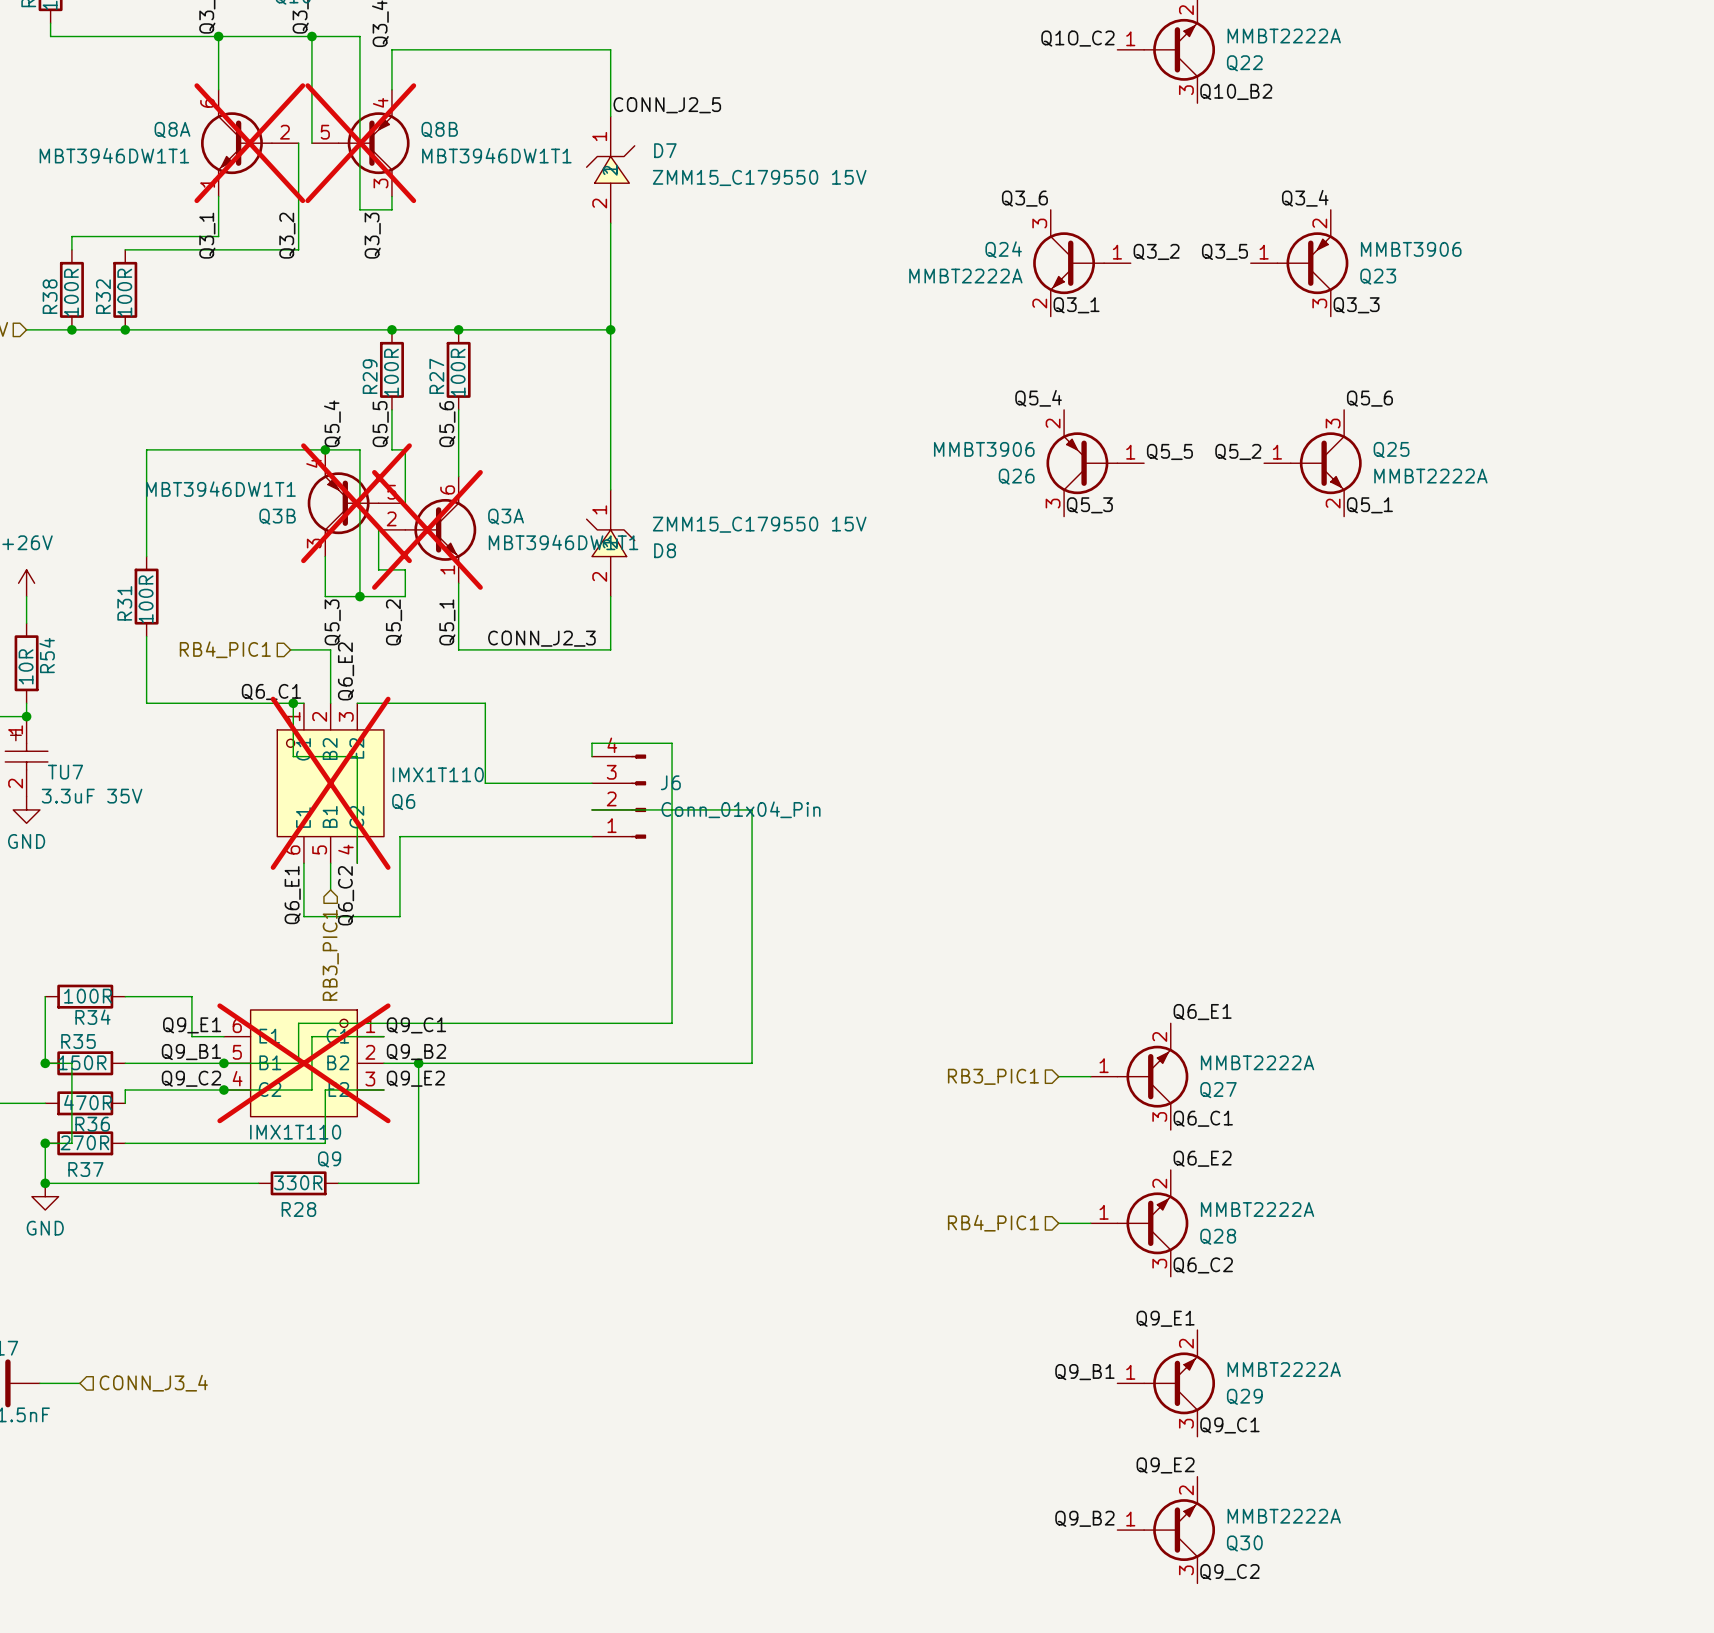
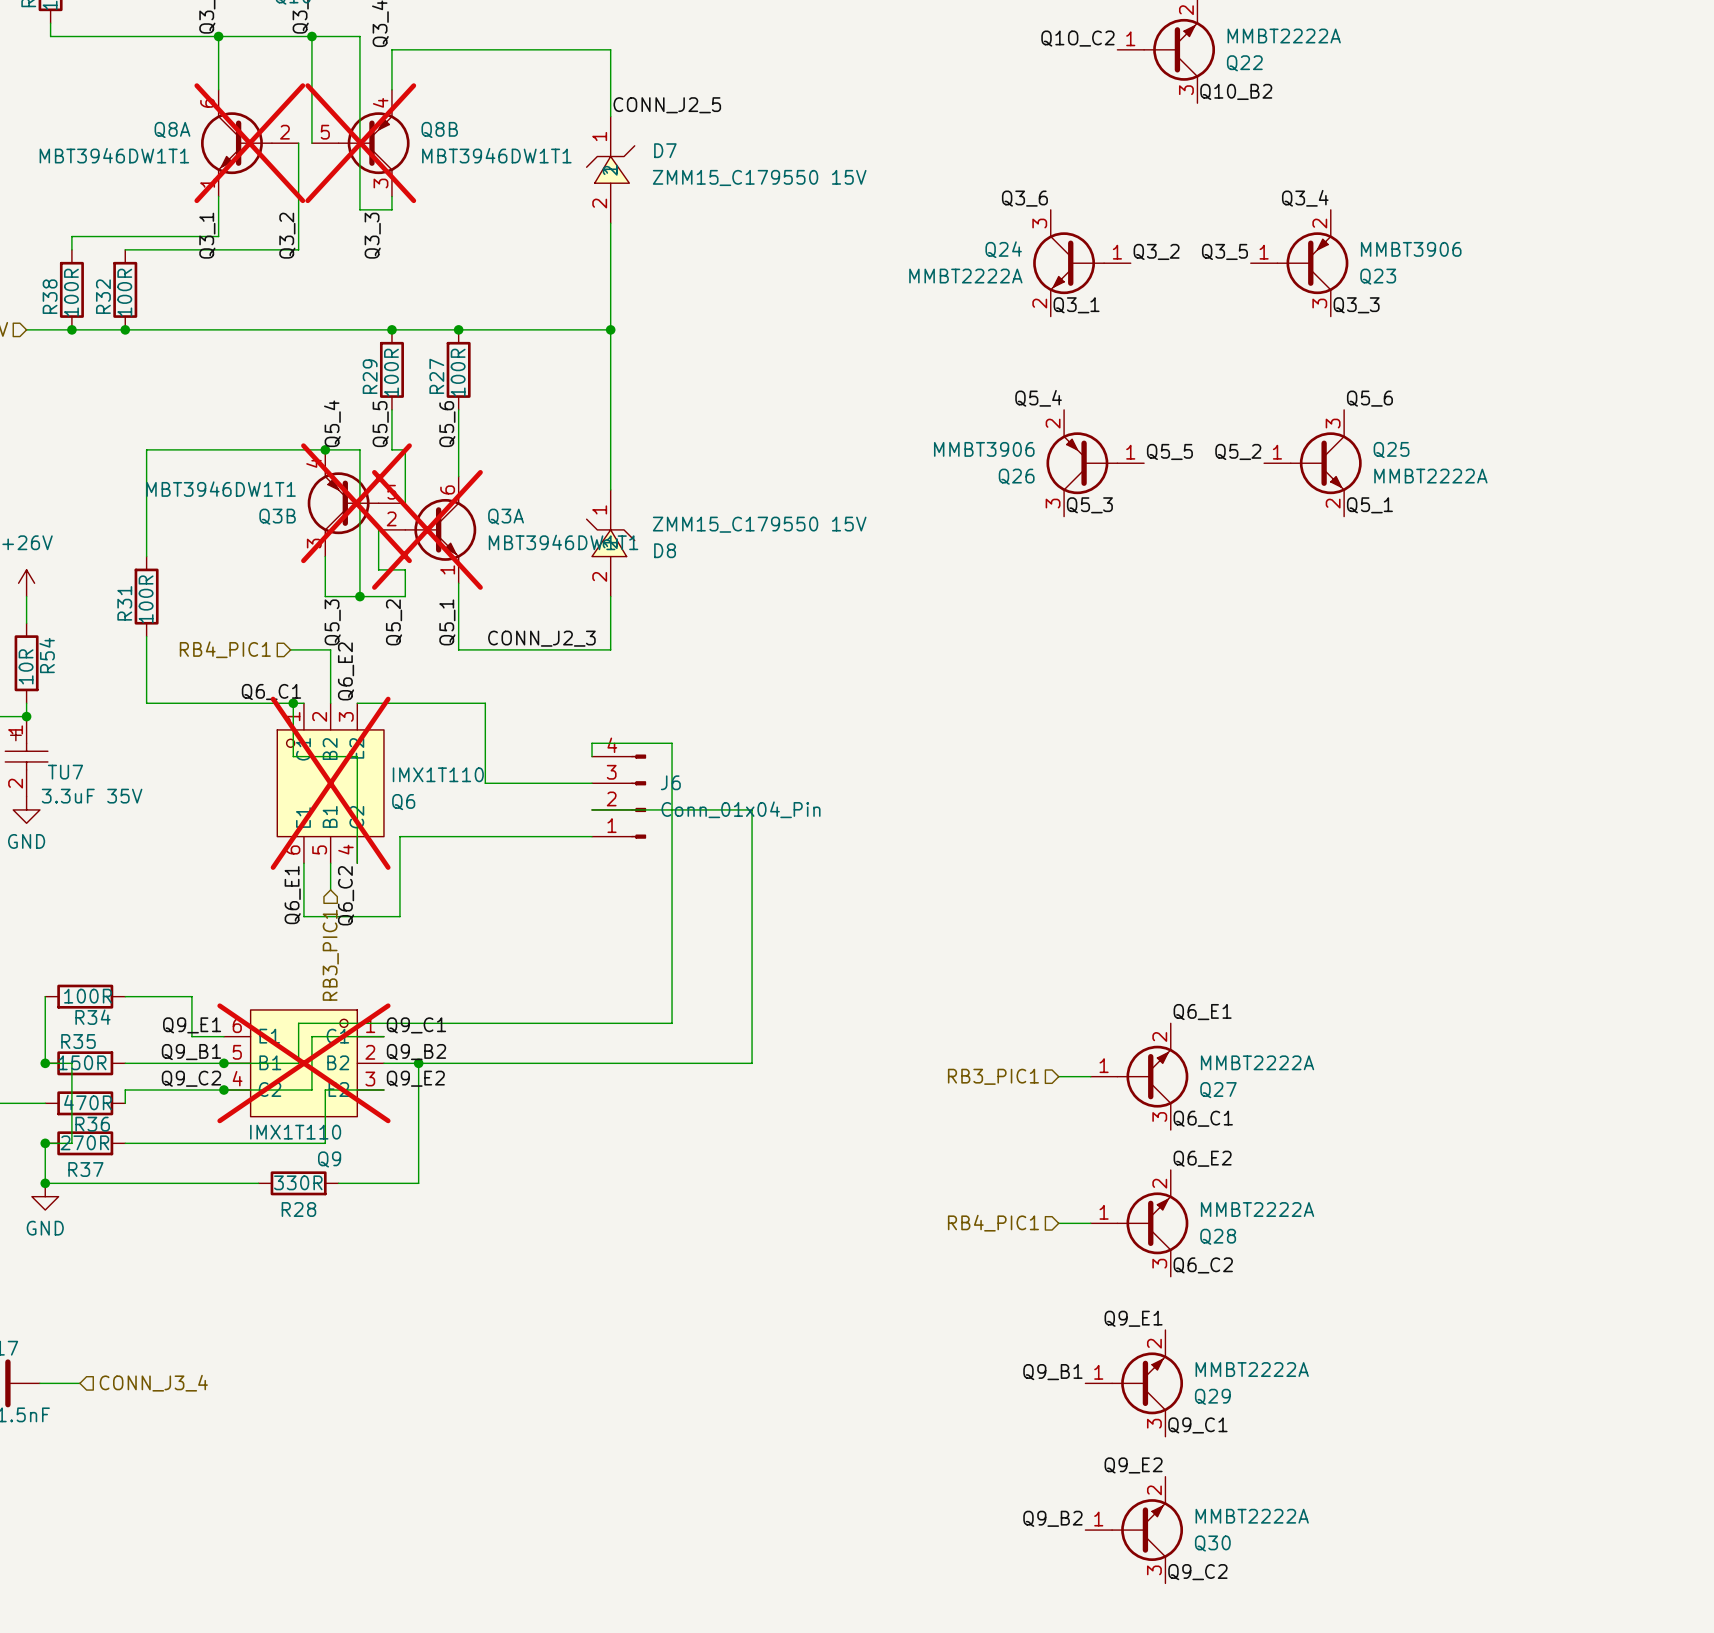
label position: Q9_E1 (1165, 1318) -> Q9_E1 (1133, 1318)
label position: Q9_B1 (1084, 1372) -> Q9_B1 (1052, 1372)
Q29 position: (1166, 1383) -> (1134, 1383)
label position: Q9_C1 (1229, 1425) -> Q9_C1 (1197, 1425)
label position: Q9_E2 (1165, 1465) -> Q9_E2 (1133, 1465)
label position: Q9_B2 (1084, 1518) -> Q9_B2 (1052, 1518)
Q30 position: (1166, 1530) -> (1134, 1530)
label position: Q9_C2 (1229, 1572) -> Q9_C2 (1197, 1572)

